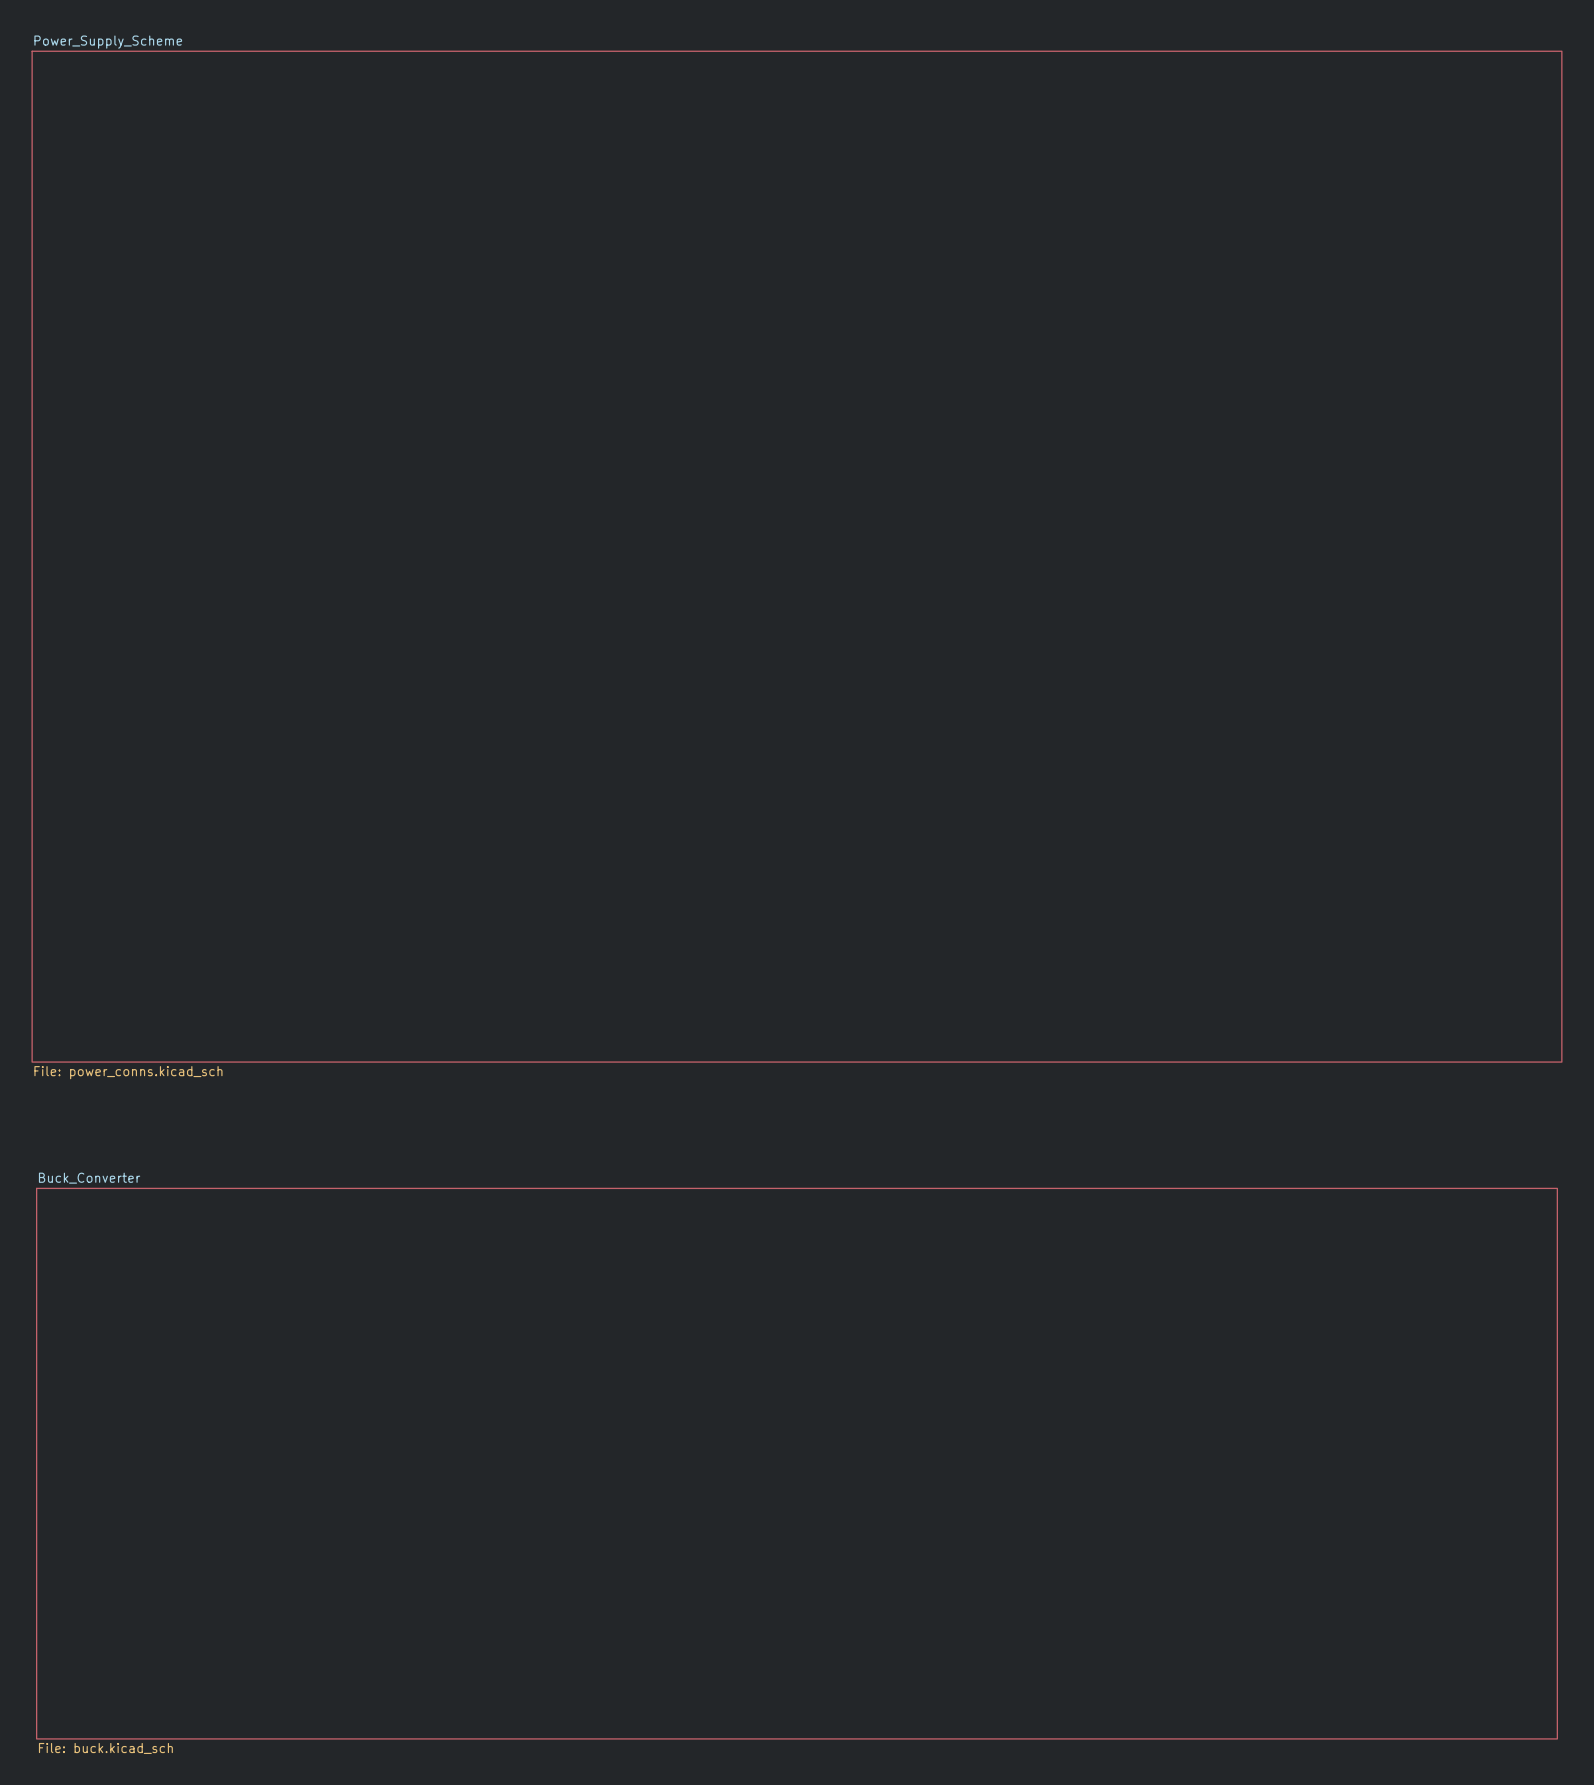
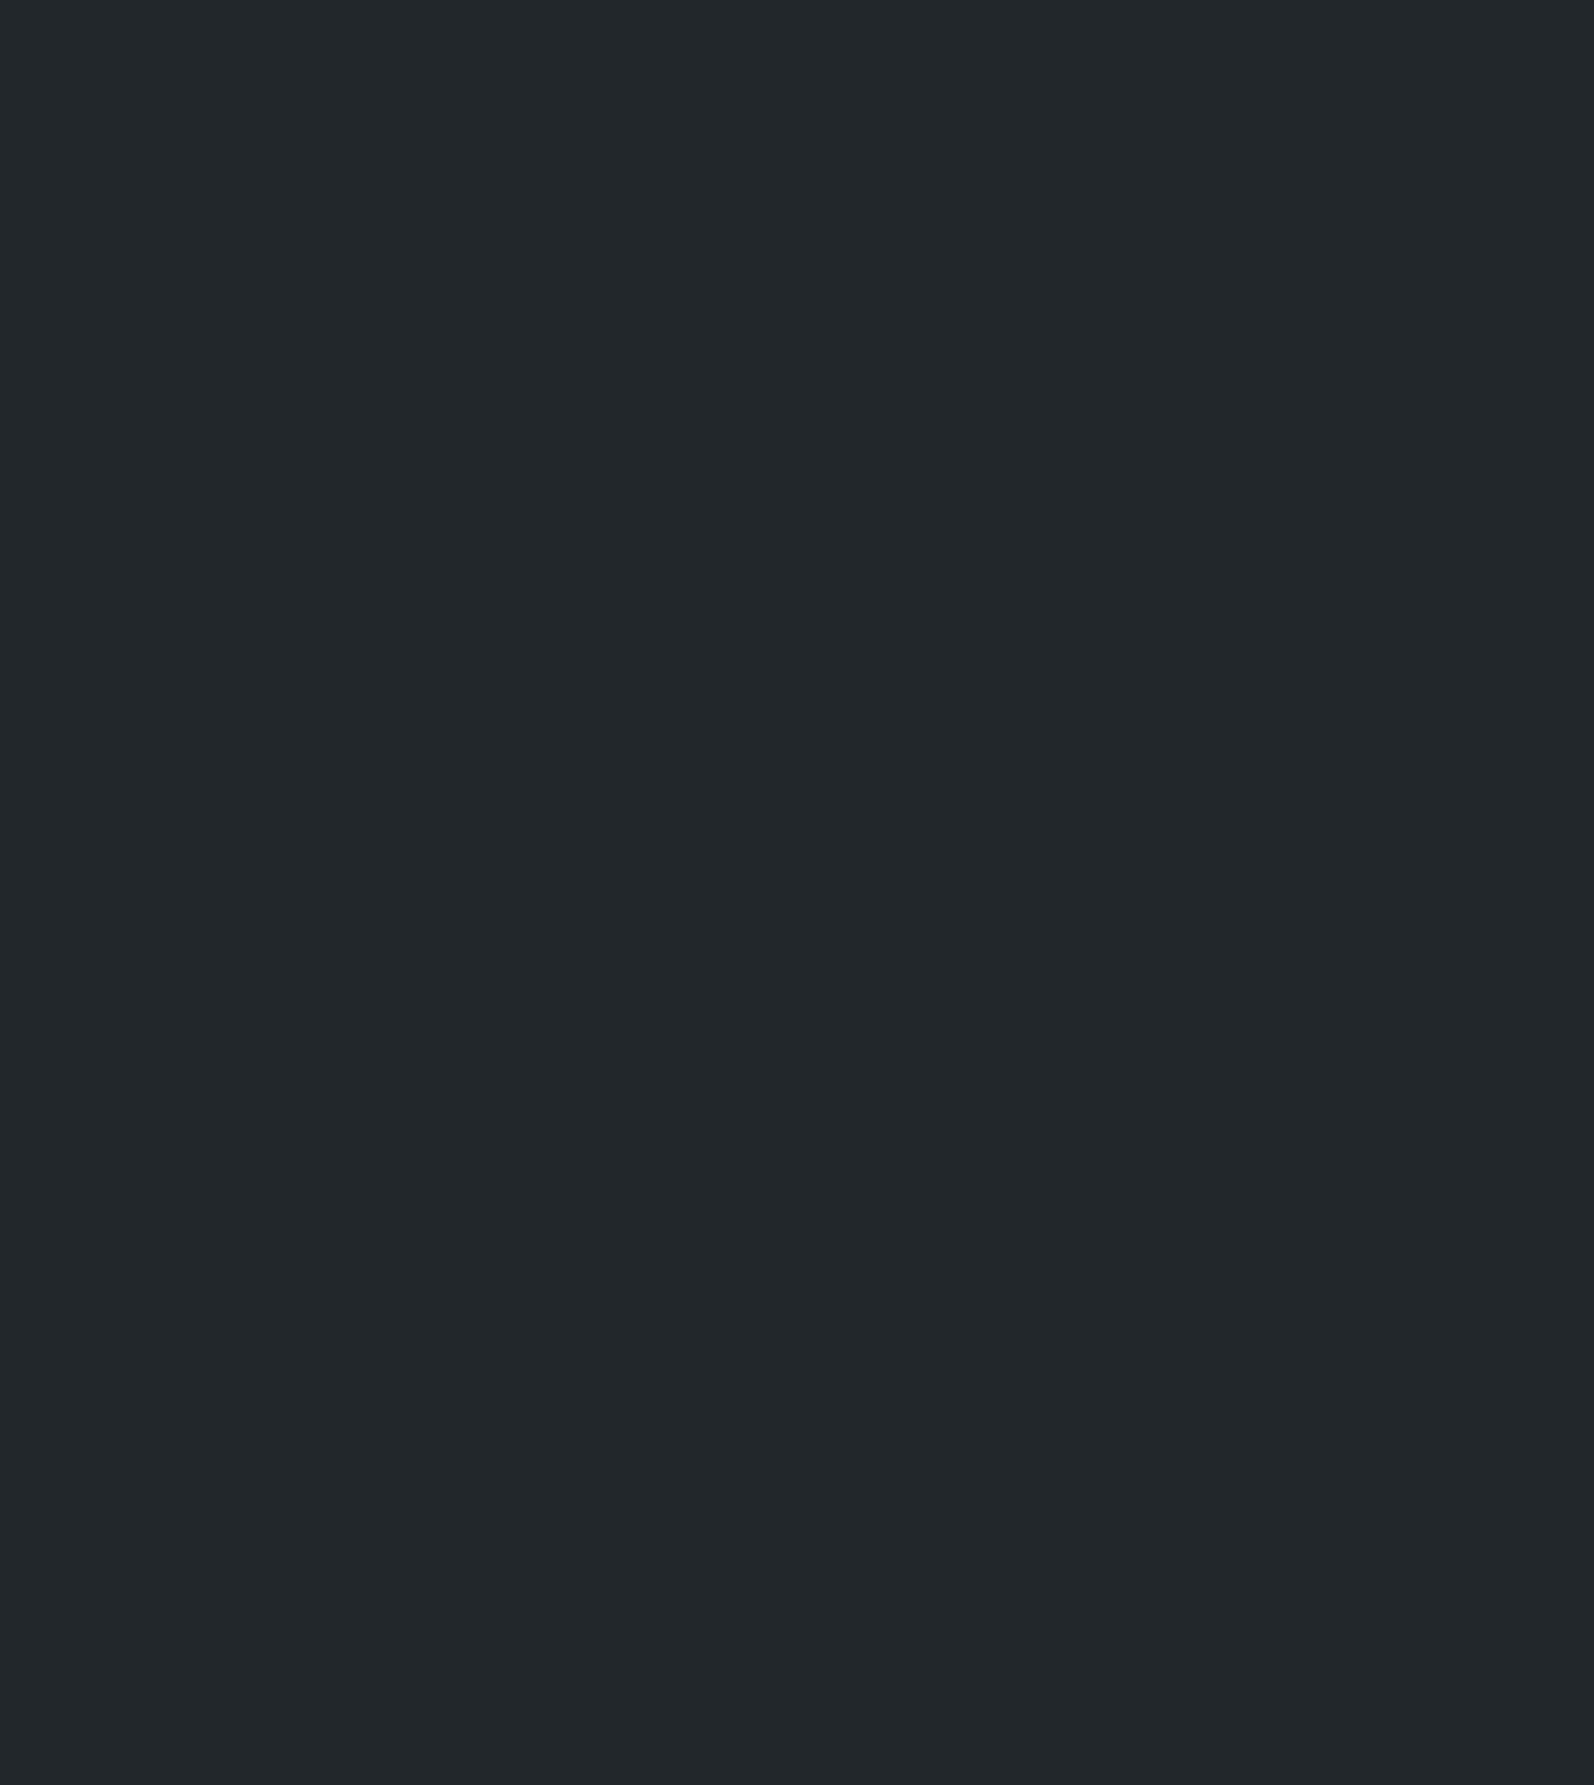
sheet Power_Supply_Scheme: File: power_conns.kicad_sch (796, 556) -> none
sheet Buck_Converter: File: buck.kicad_sch (796, 1463) -> none

